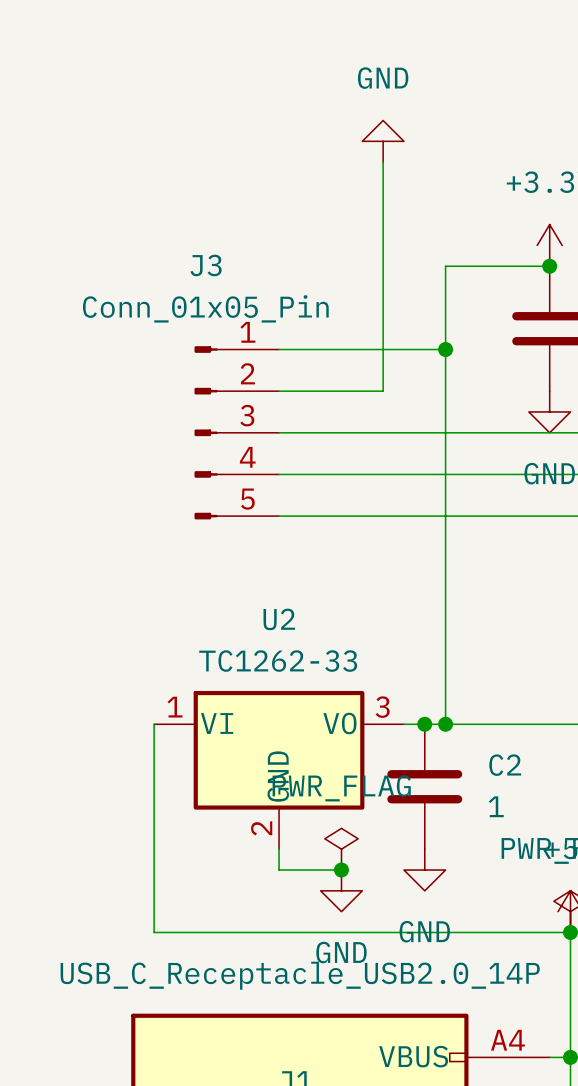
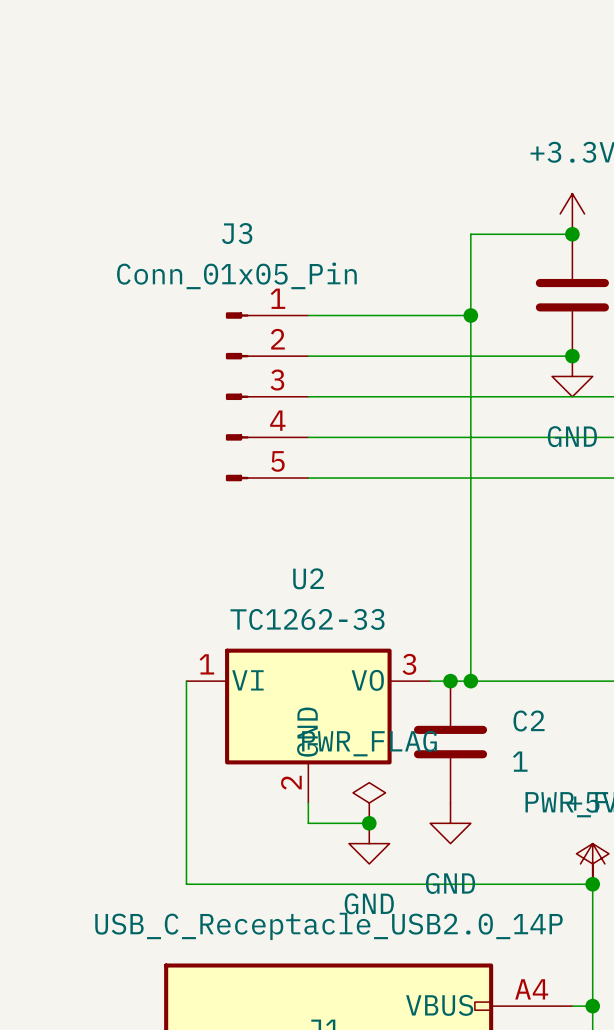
power symbol: GND (383, 141) -> none
wire: (383, 162) (383, 391) -> (572, 356) (409, 356)
junction: none -> (572, 356)

